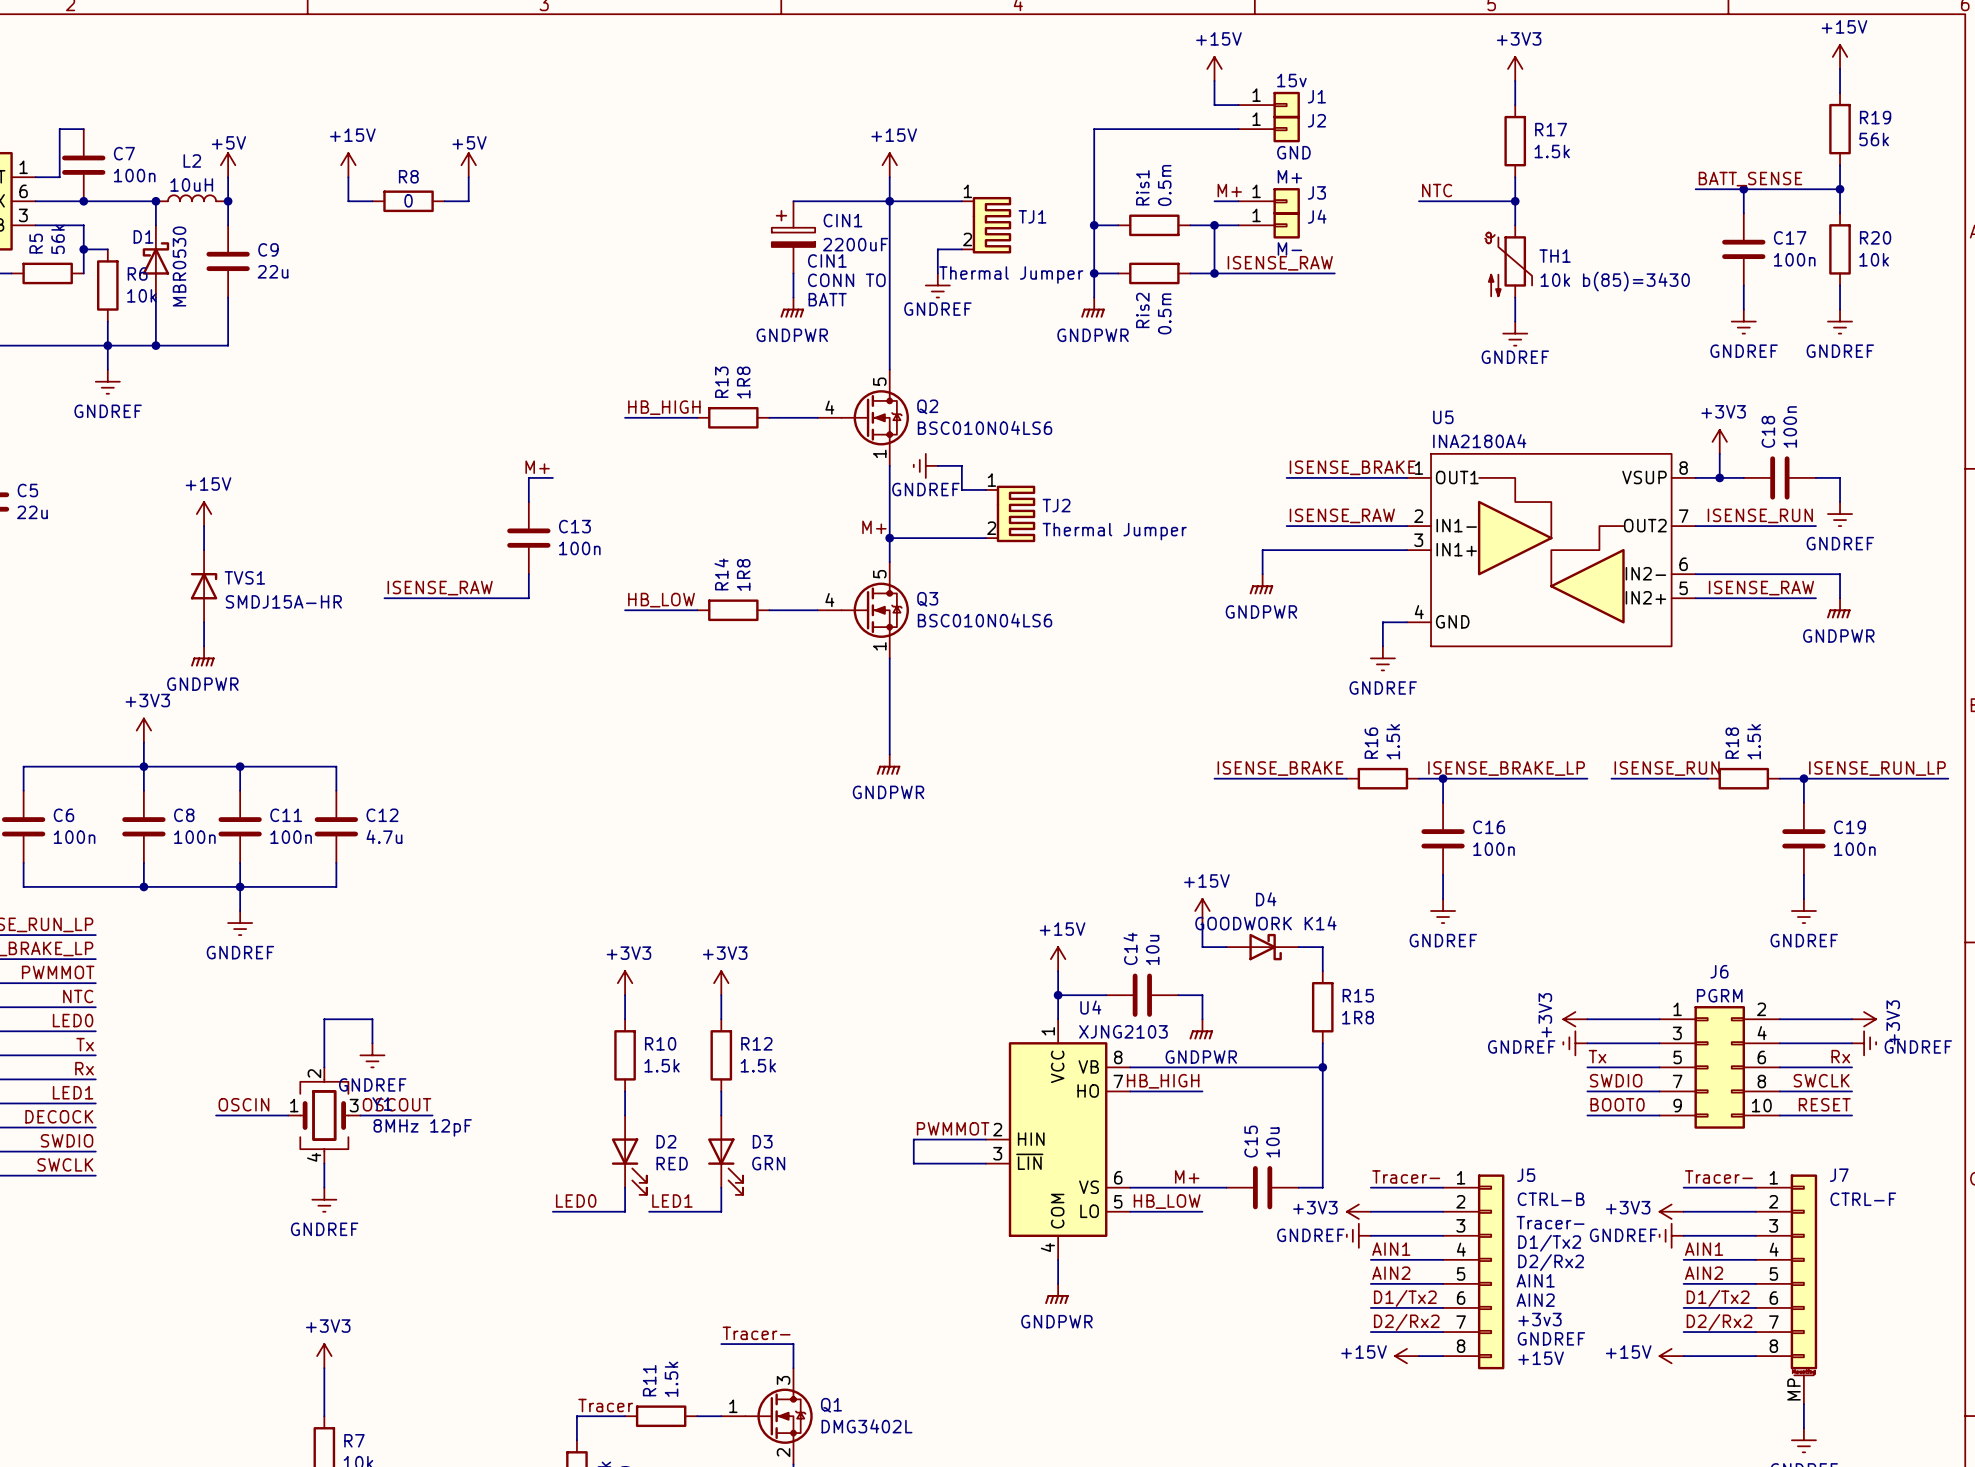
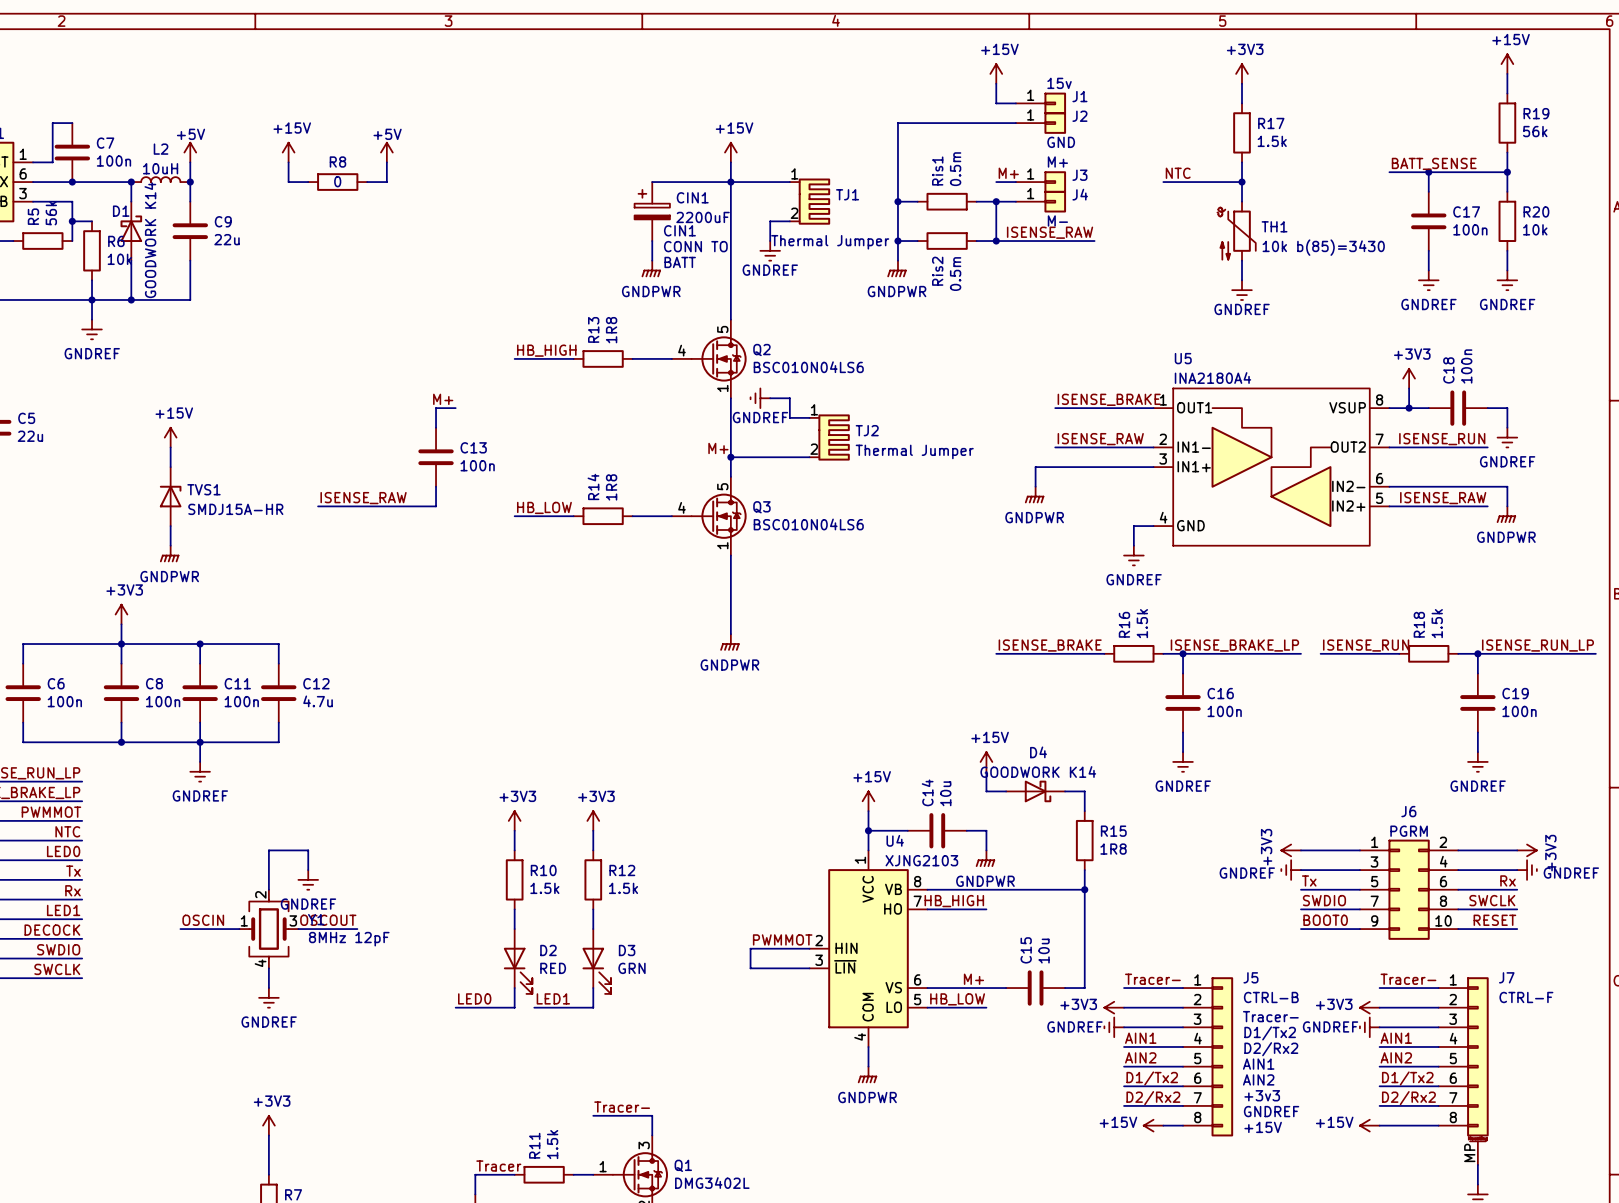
D1 value: MBR0530 (179, 266) -> GOODWORK K14 (150, 240)

